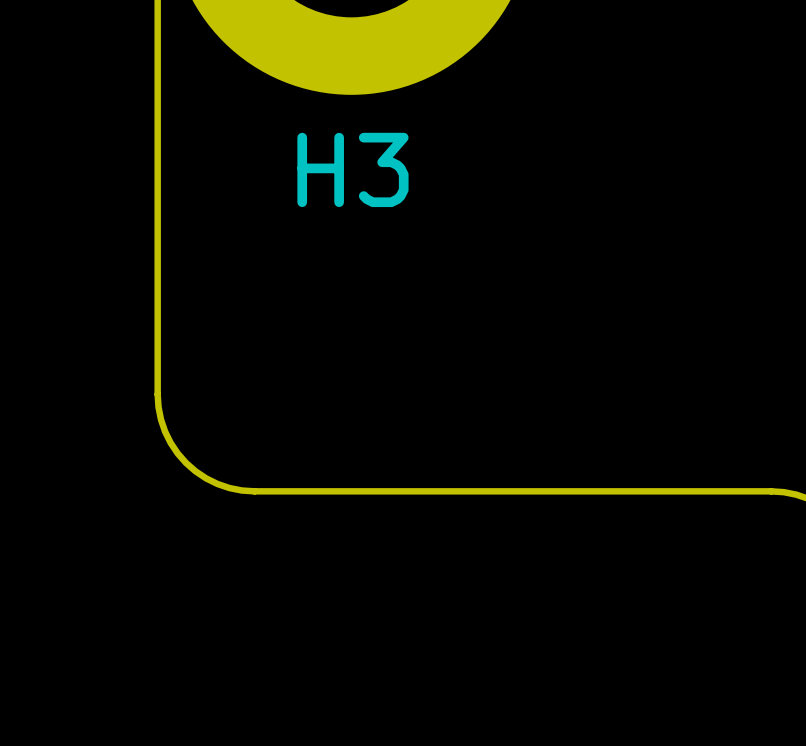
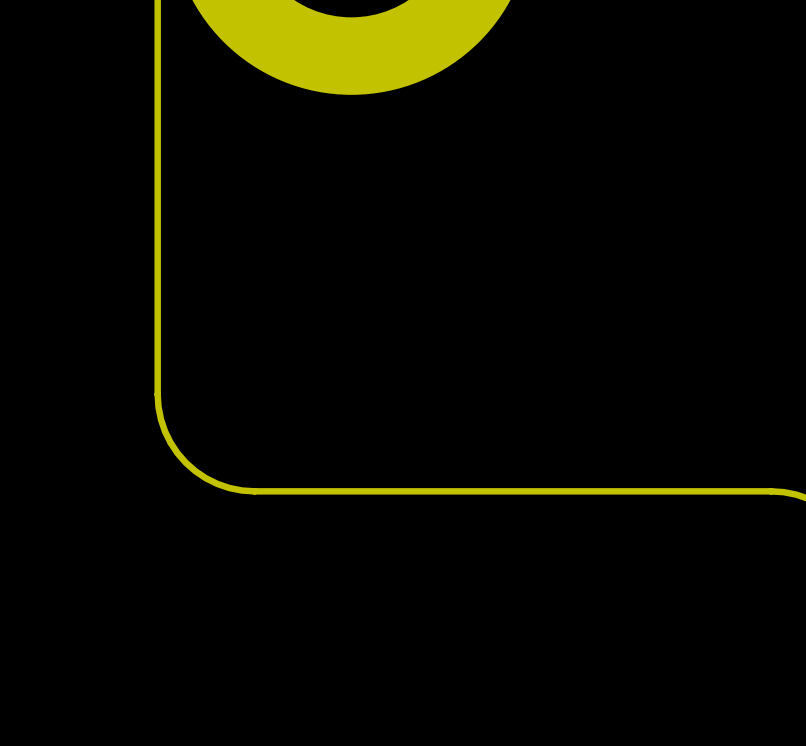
H3 name: H3 (352, 169) -> none

